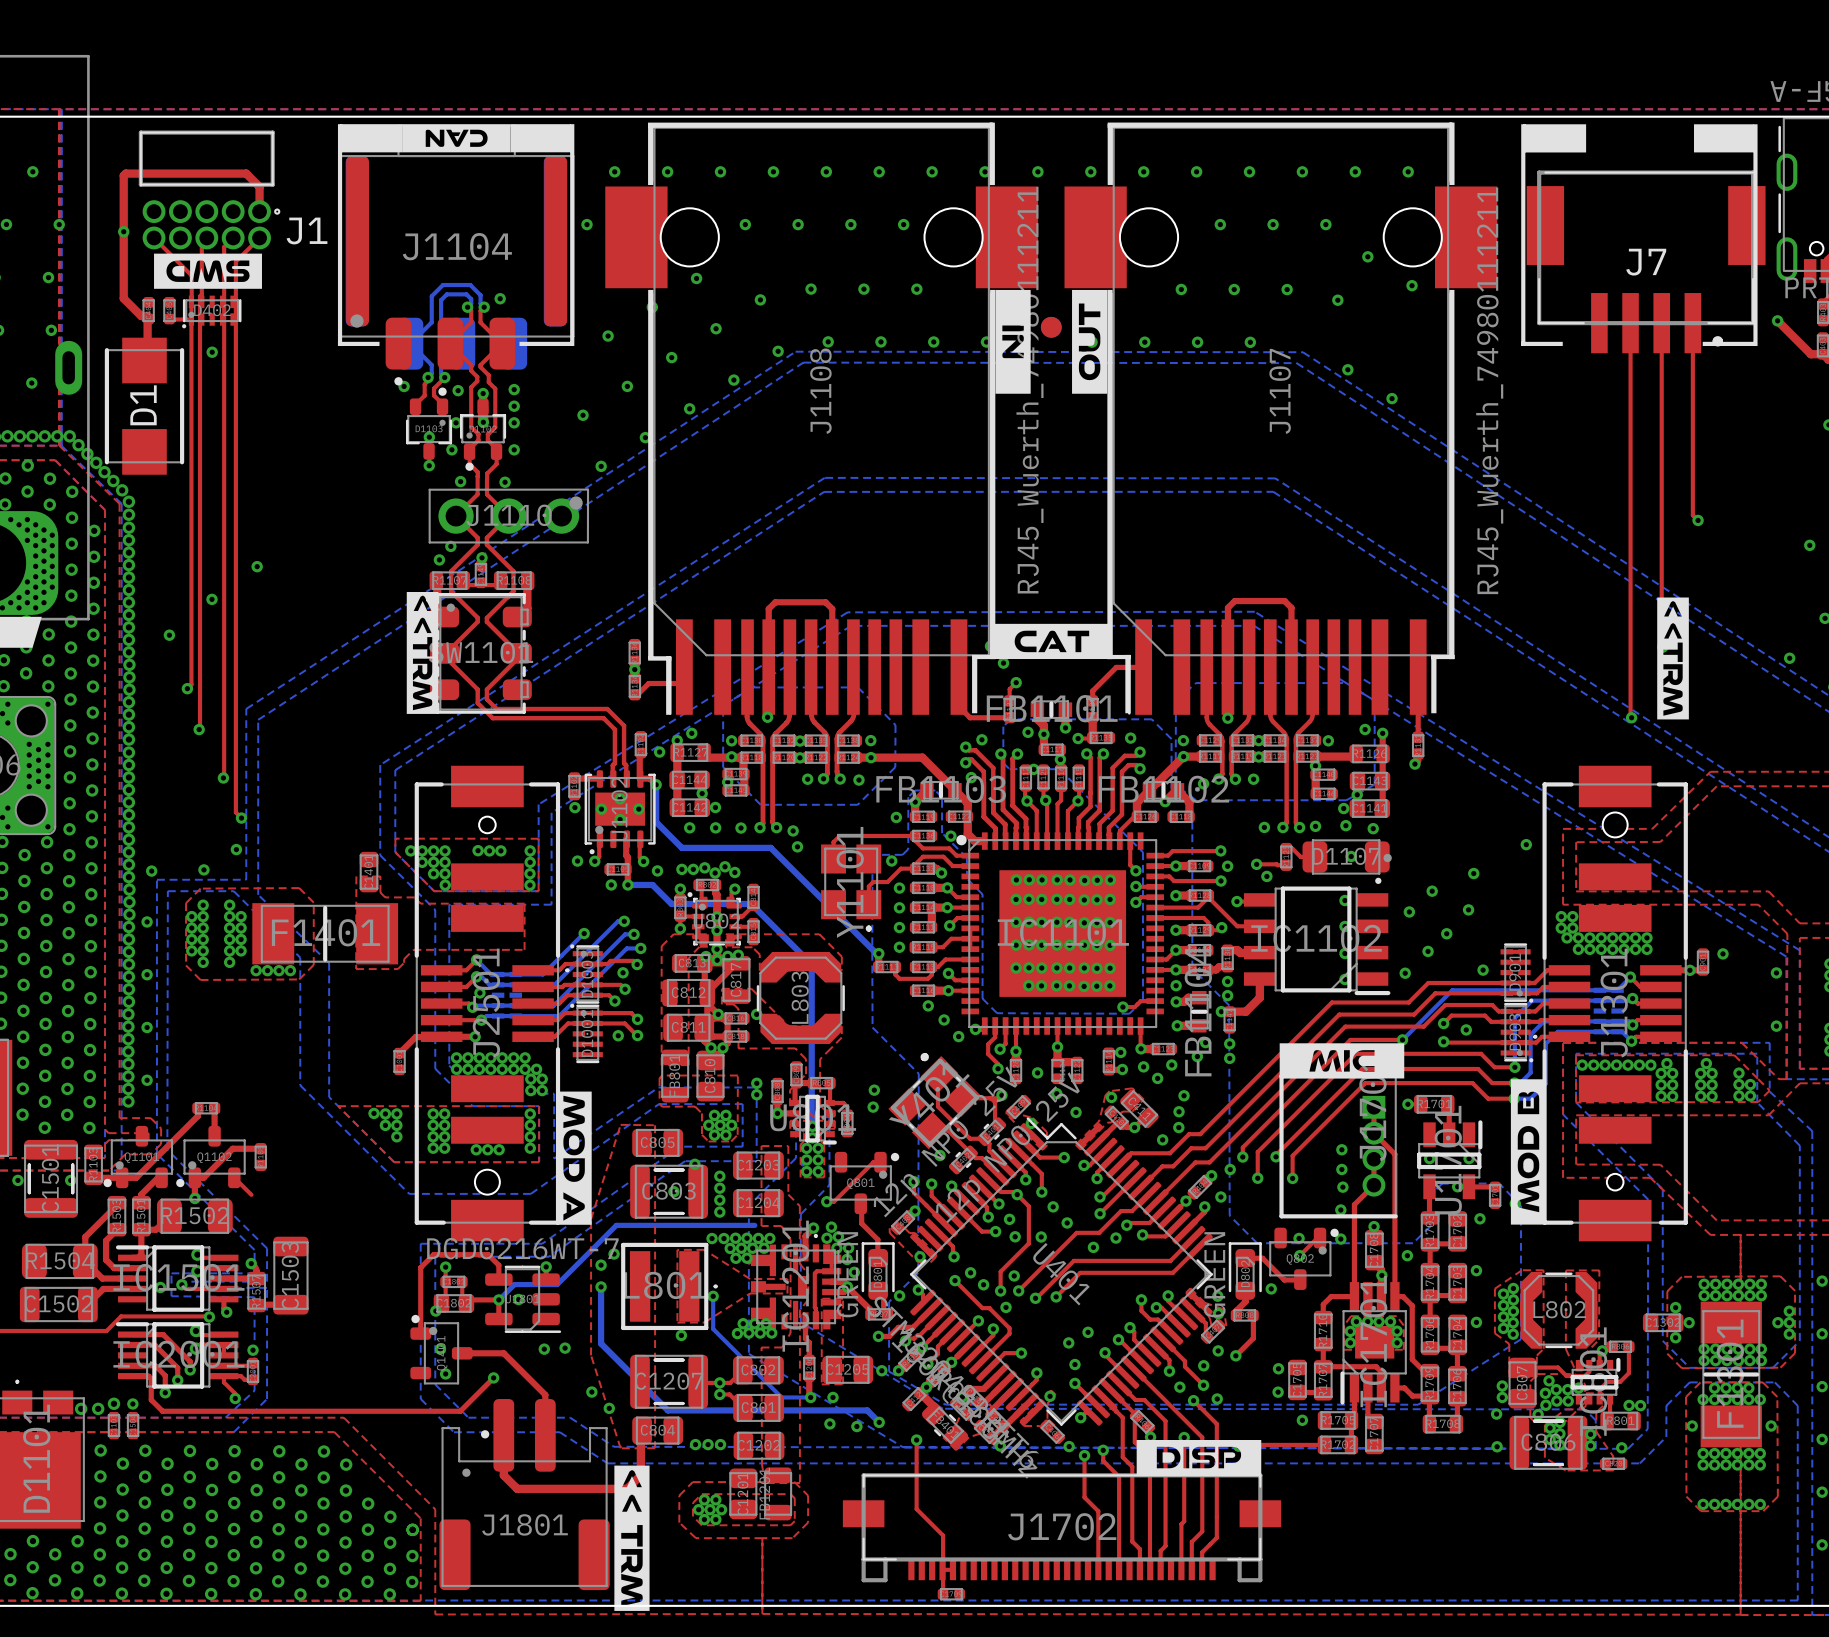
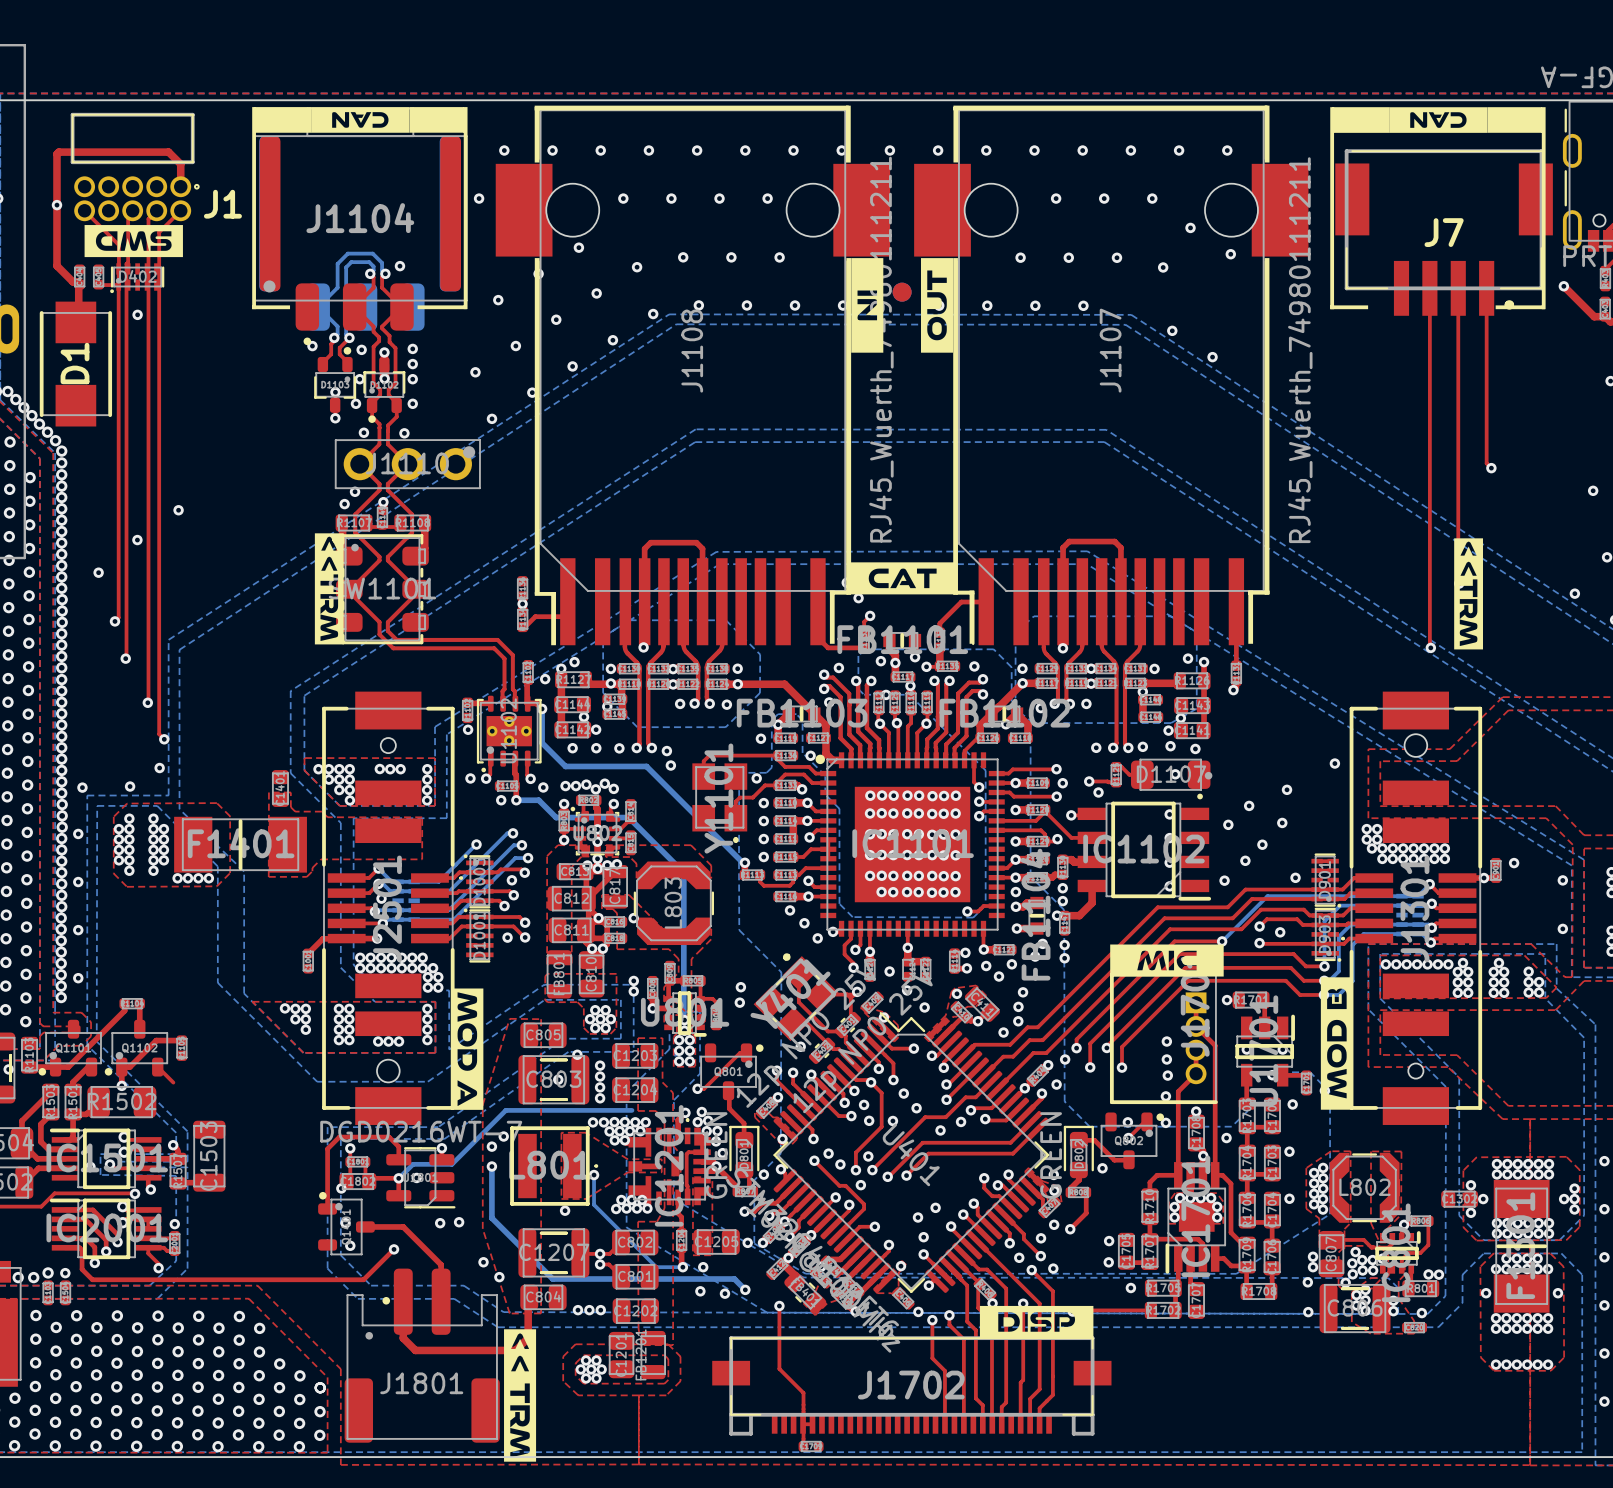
drawing: none -> [1389, 107, 1488, 133]

